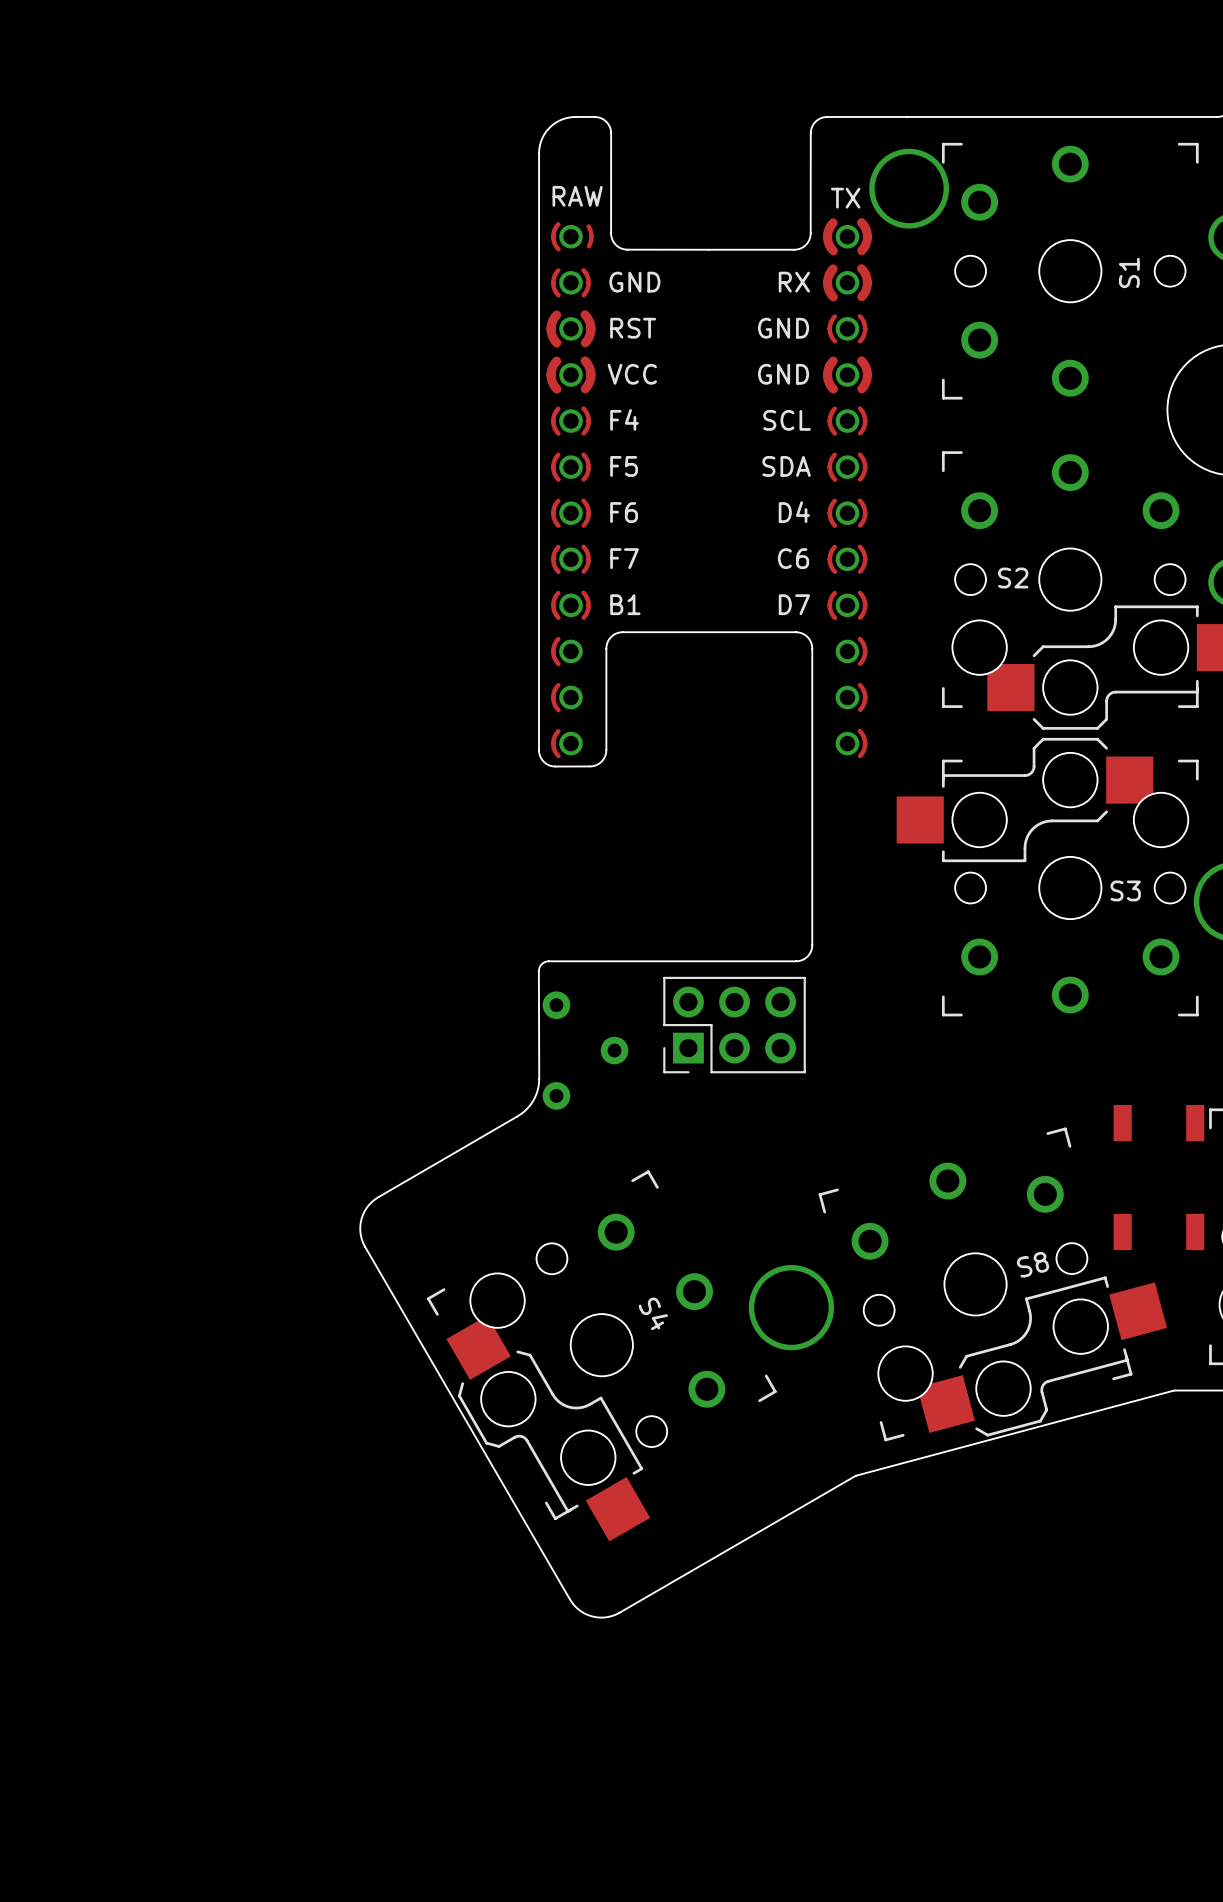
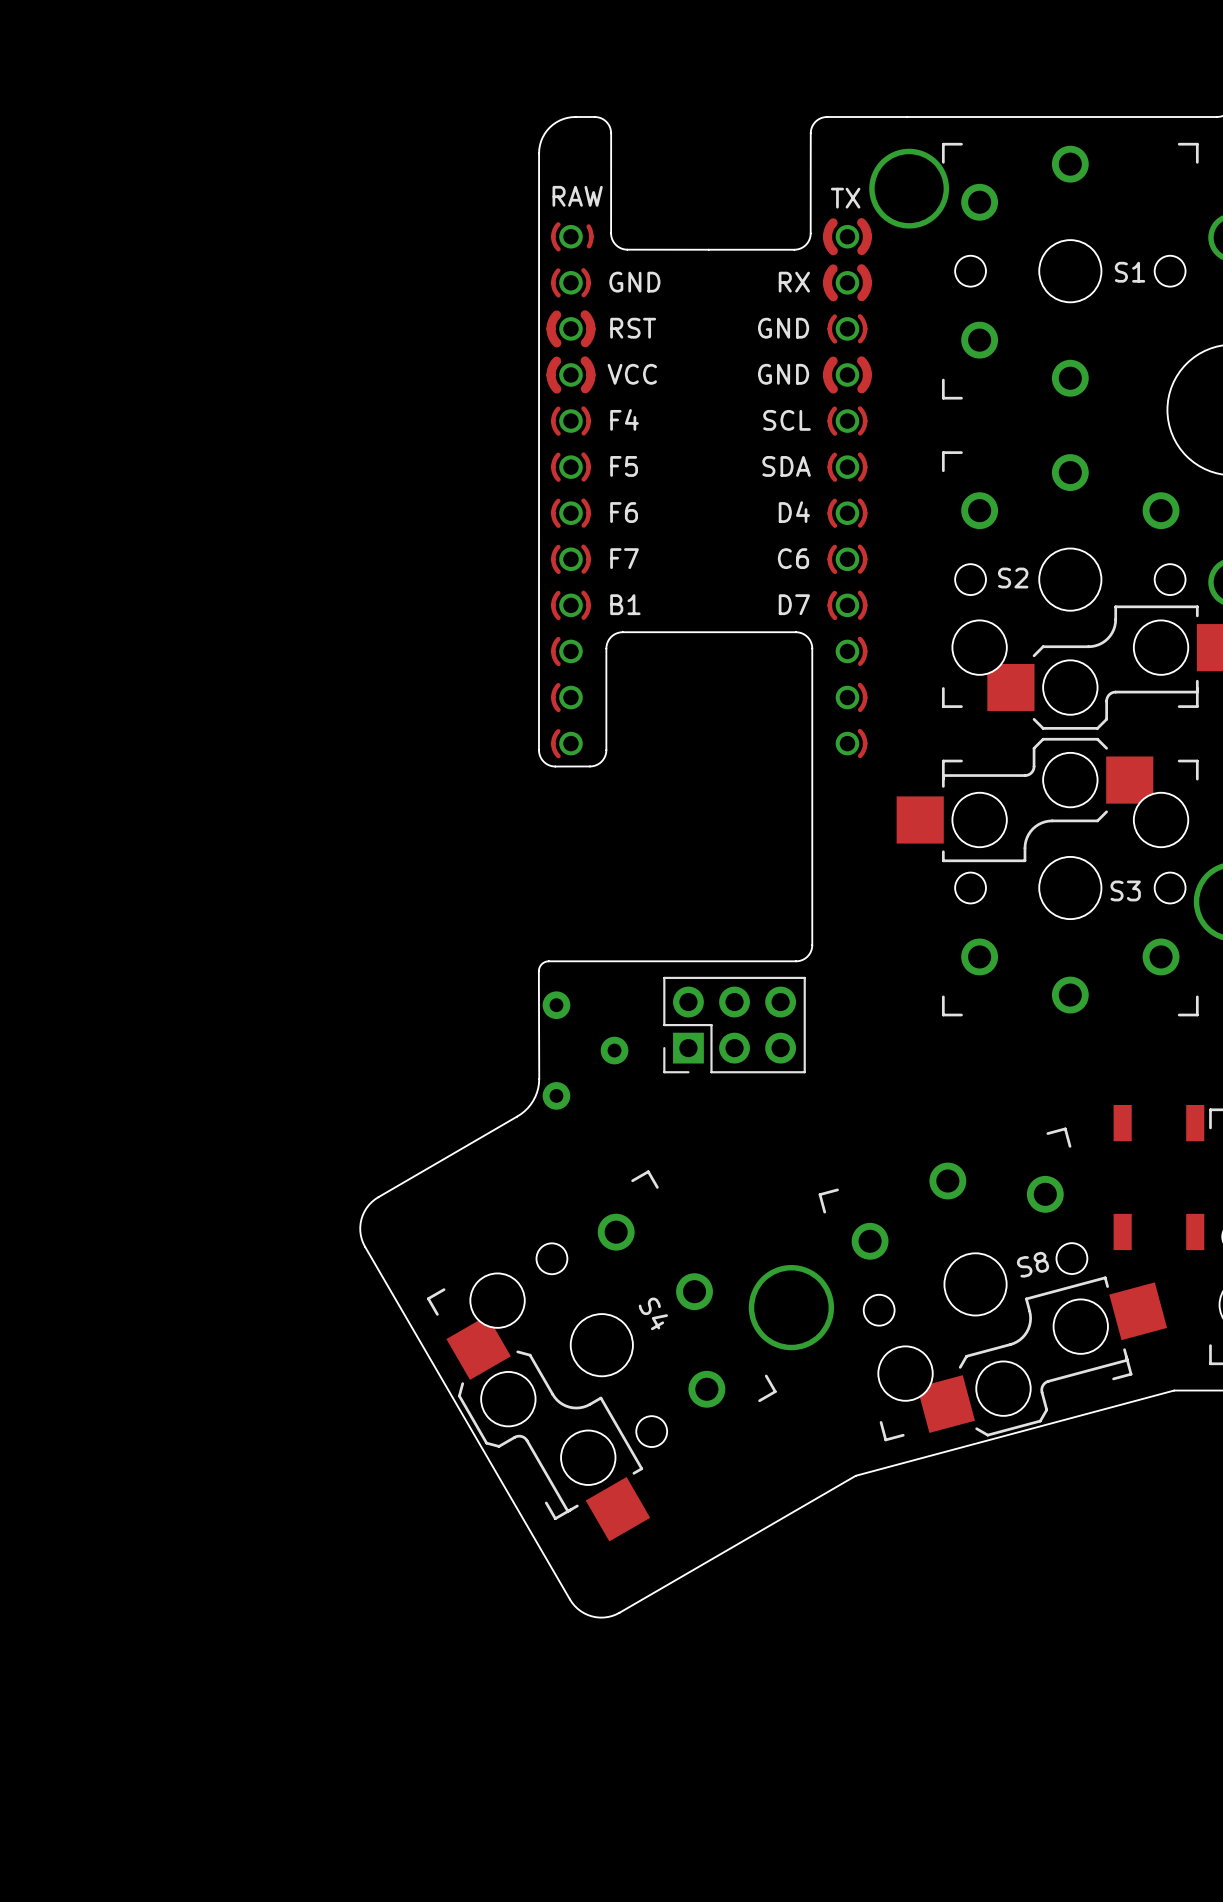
S1 name rotation: 0° (1129, 272) -> 90° clockwise (1130, 272)

